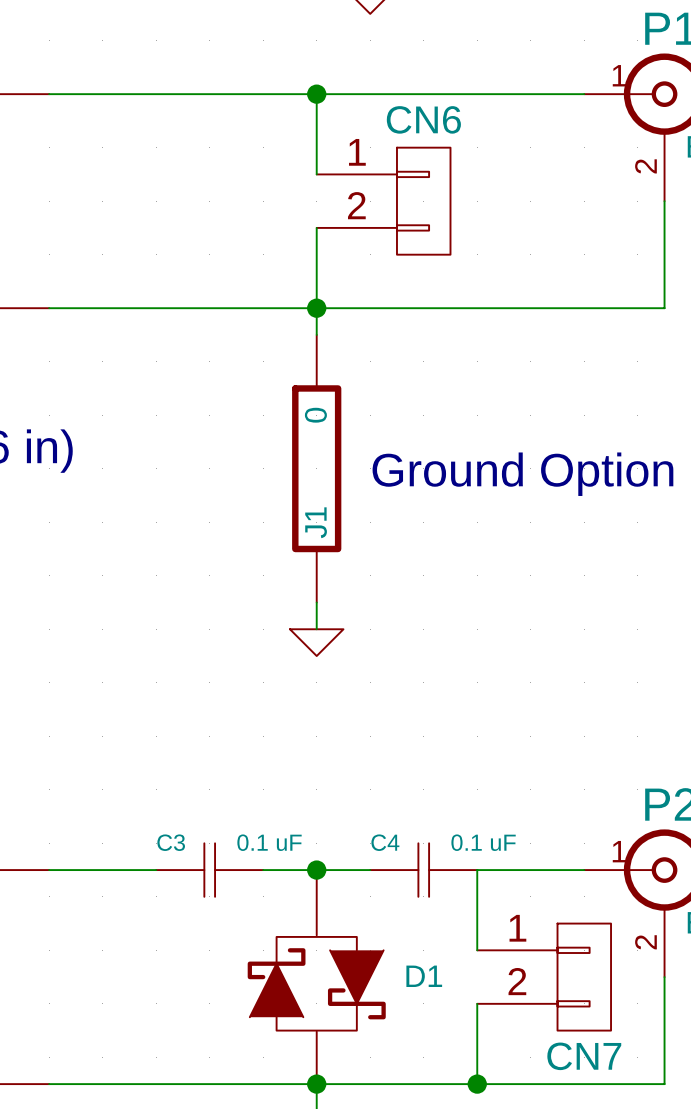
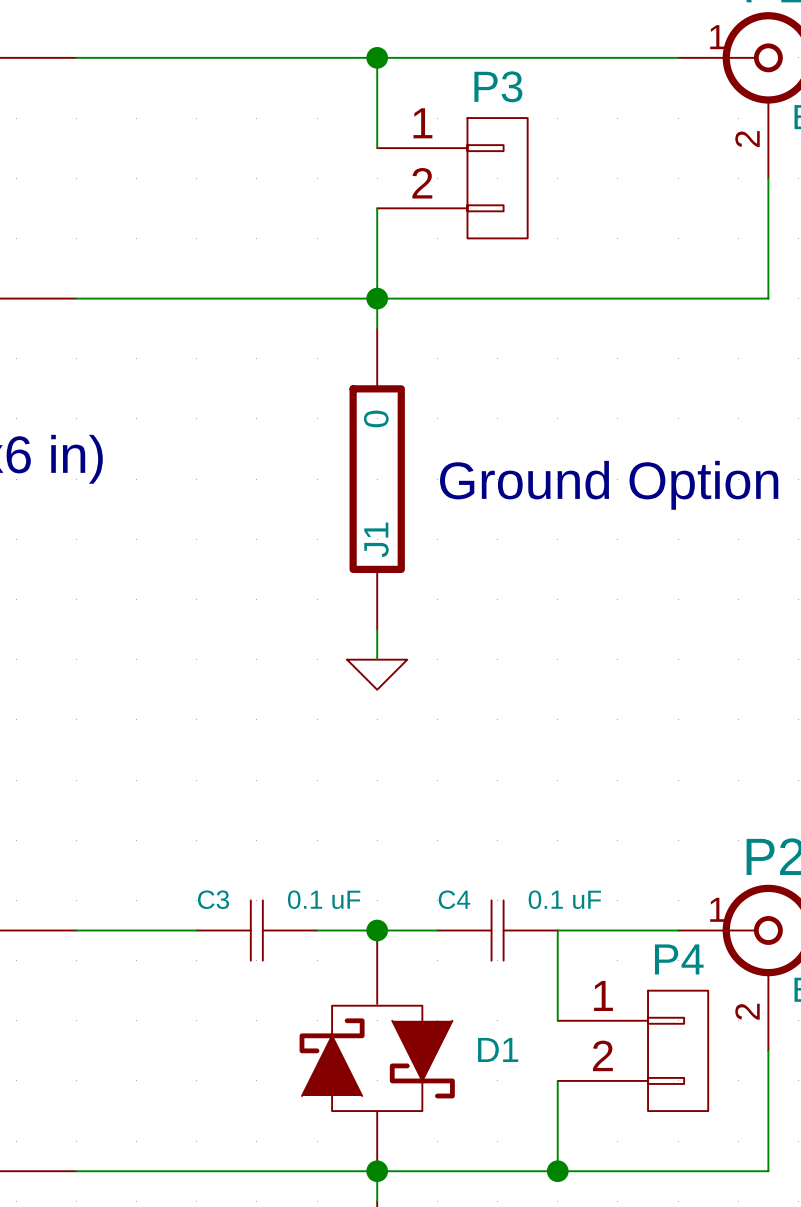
CN6 name: CN6 (423, 119) -> P3 (498, 86)
CN7 name: CN7 (584, 1056) -> P4 (679, 959)

